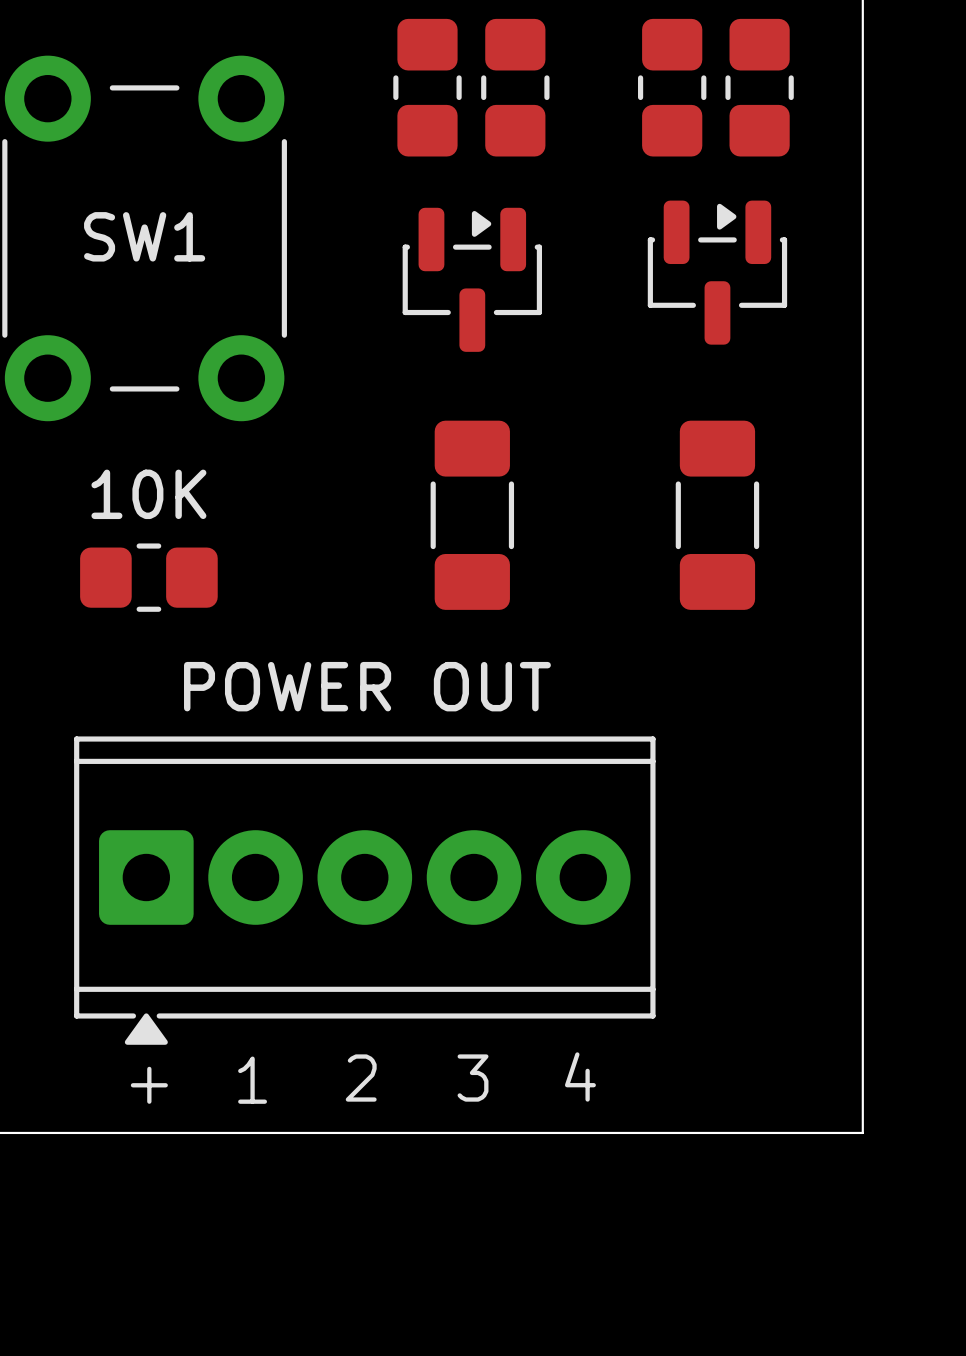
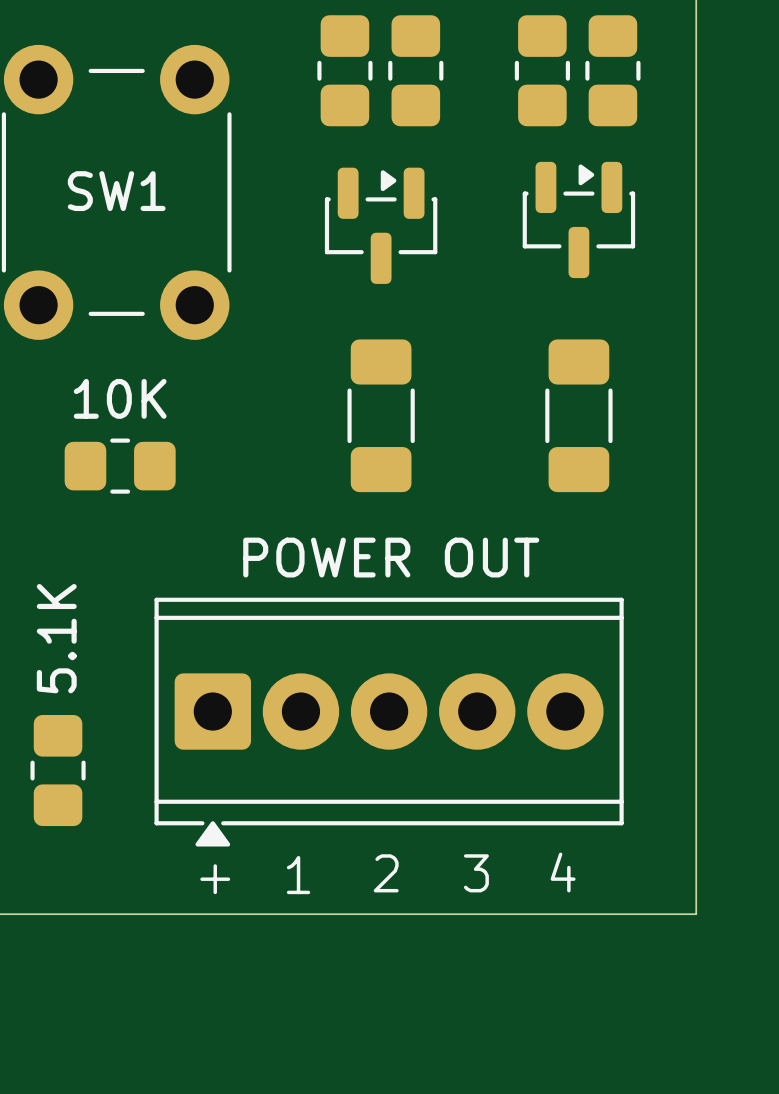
part position: (364, 890) -> (389, 722)
part: none -> 5.1K (58, 770)
text: 4 (580, 1077) -> 3 (476, 873)
text: 2 (361, 1078) -> 1 (298, 875)
text: 3 (473, 1078) -> 2 (386, 873)
text: 1 (252, 1080) -> + (215, 879)
text: none -> 4 (563, 872)
text: + (149, 1085) -> none

